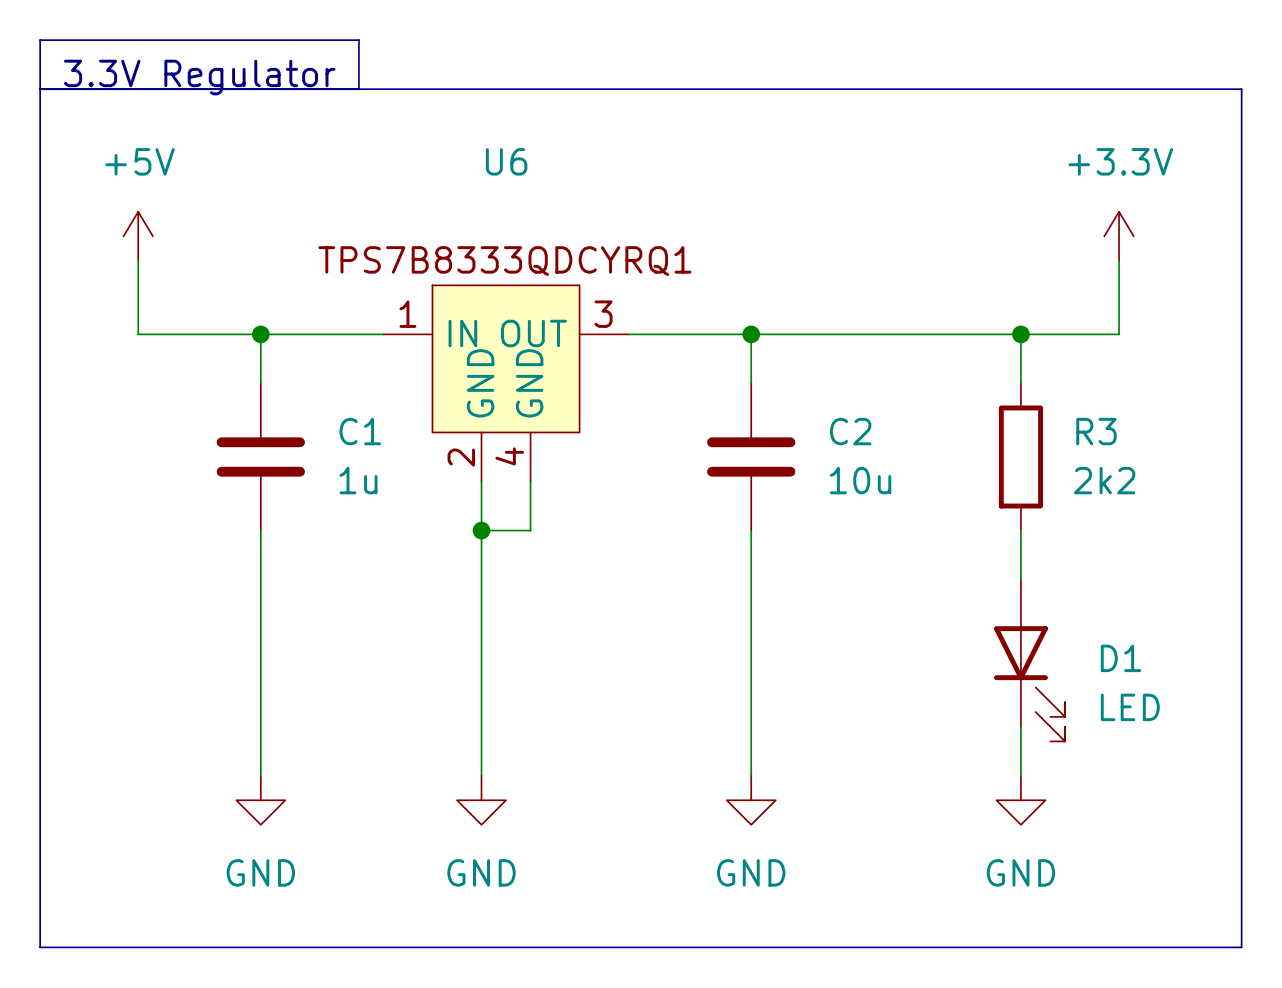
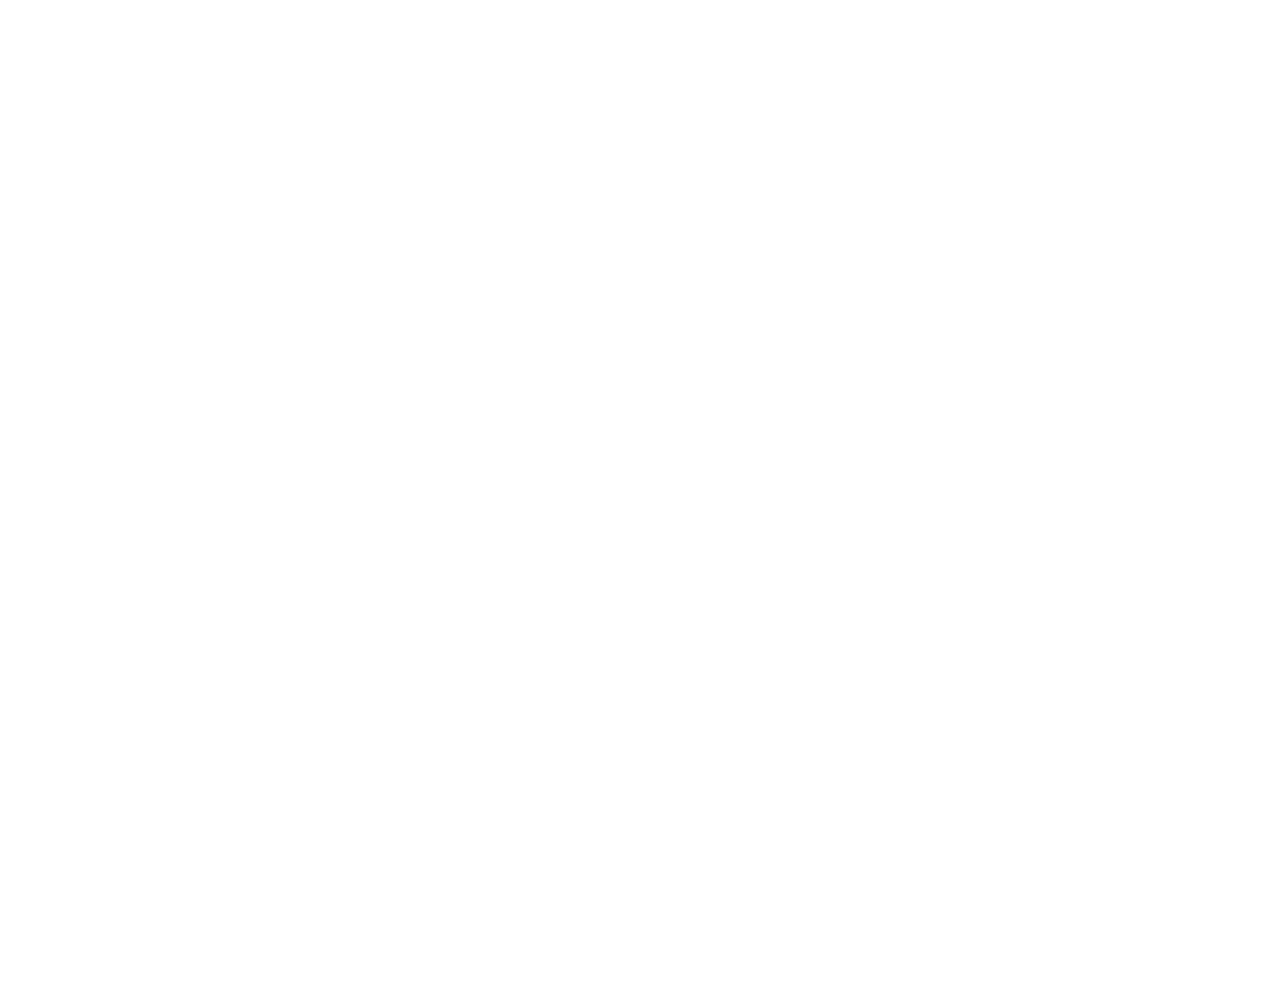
text: 3.3V Regulator (199, 77) -> none
line: (40, 89) (1241, 89) (1241, 947) (40, 947) (40, 40) (358, 40) (358, 89) -> none
power symbol: +5V (138, 236) -> none
power symbol: +3.3V (1119, 236) -> none
wire: (138, 260) (138, 334) (383, 334) -> none
wire: (1119, 260) (1119, 334) (628, 334) -> none
wire: (260, 334) (260, 383) -> none
junction: (260, 334) -> none
wire: (751, 334) (751, 383) -> none
junction: (751, 334) -> none
wire: (1020, 334) (1020, 383) -> none
junction: (1020, 334) -> none
U6: (506, 383) -> none
C1: 1u (260, 456) -> none
C2: 10u (751, 456) -> none
R3: 2k2 (1020, 456) -> none
wire: (481, 481) (481, 775) -> none
wire: (530, 481) (530, 530) (481, 530) -> none
wire: (260, 530) (260, 775) -> none
junction: (481, 530) -> none
wire: (751, 530) (751, 775) -> none
wire: (1020, 530) (1020, 579) -> none
D1: LED (1029, 660) -> none
wire: (1020, 726) (1020, 775) -> none
power symbol: GND (260, 800) -> none
power symbol: GND (481, 800) -> none
power symbol: GND (751, 800) -> none
power symbol: GND (1020, 800) -> none

